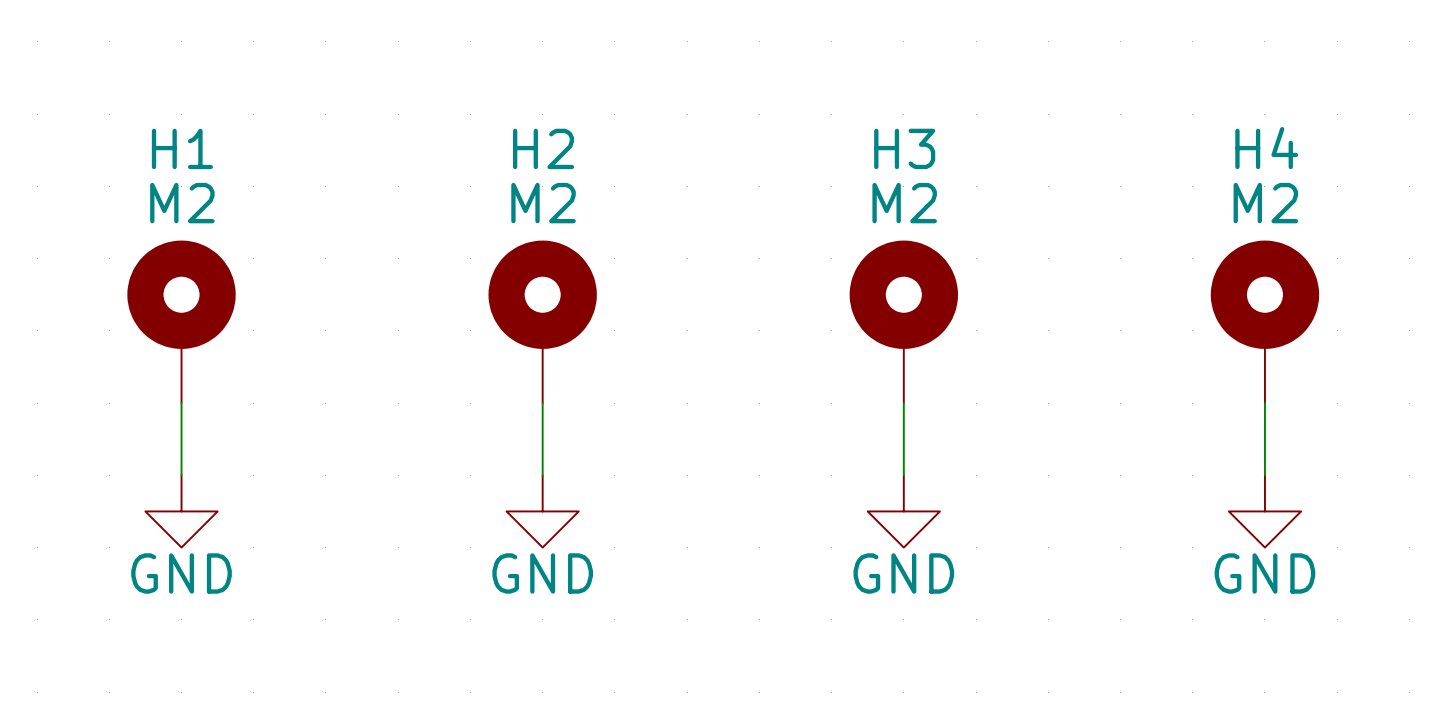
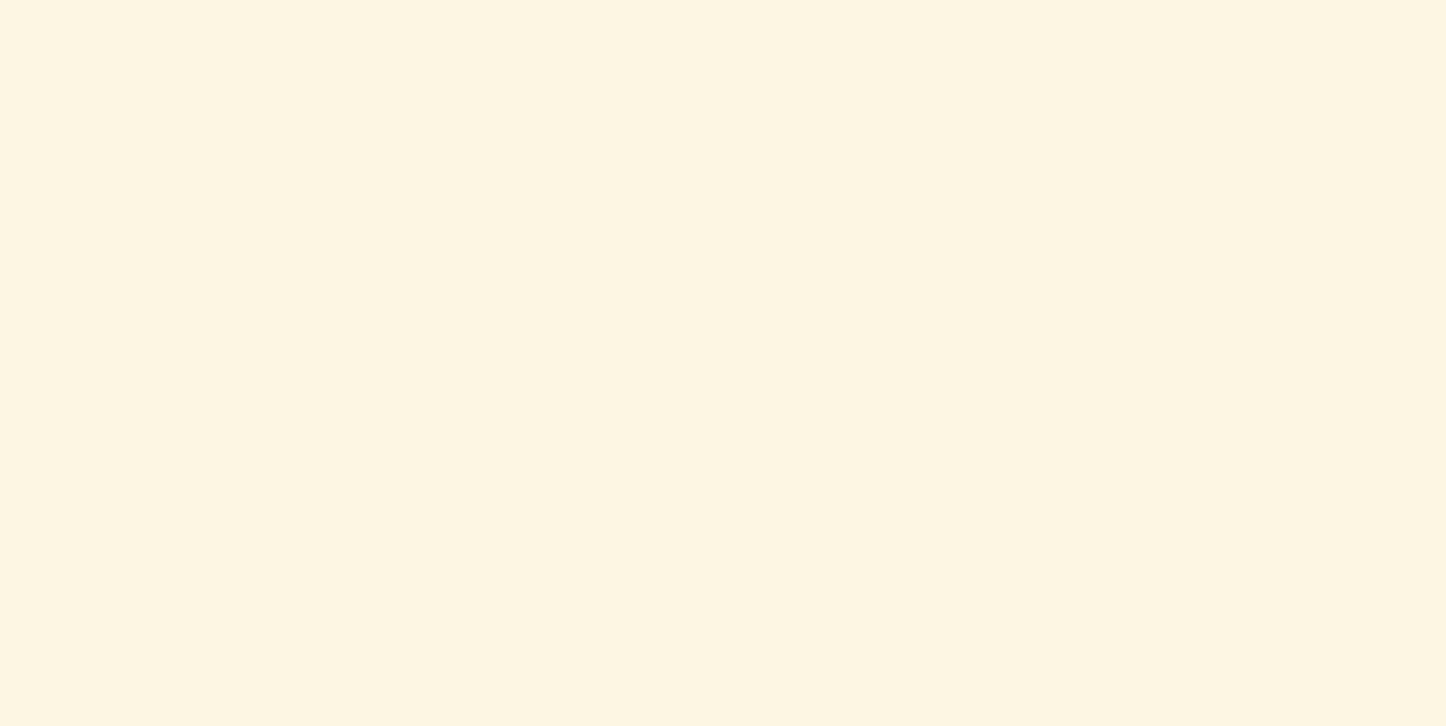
H1: M2 (181, 321) -> none
H2: M2 (542, 321) -> none
H3: M2 (903, 321) -> none
H4: M2 (1264, 321) -> none
wire: (181, 403) (181, 475) -> none
wire: (542, 403) (542, 475) -> none
wire: (903, 403) (903, 475) -> none
wire: (1264, 403) (1264, 475) -> none
power symbol: GND (181, 511) -> none
power symbol: GND (542, 511) -> none
power symbol: GND (903, 511) -> none
power symbol: GND (1264, 511) -> none

